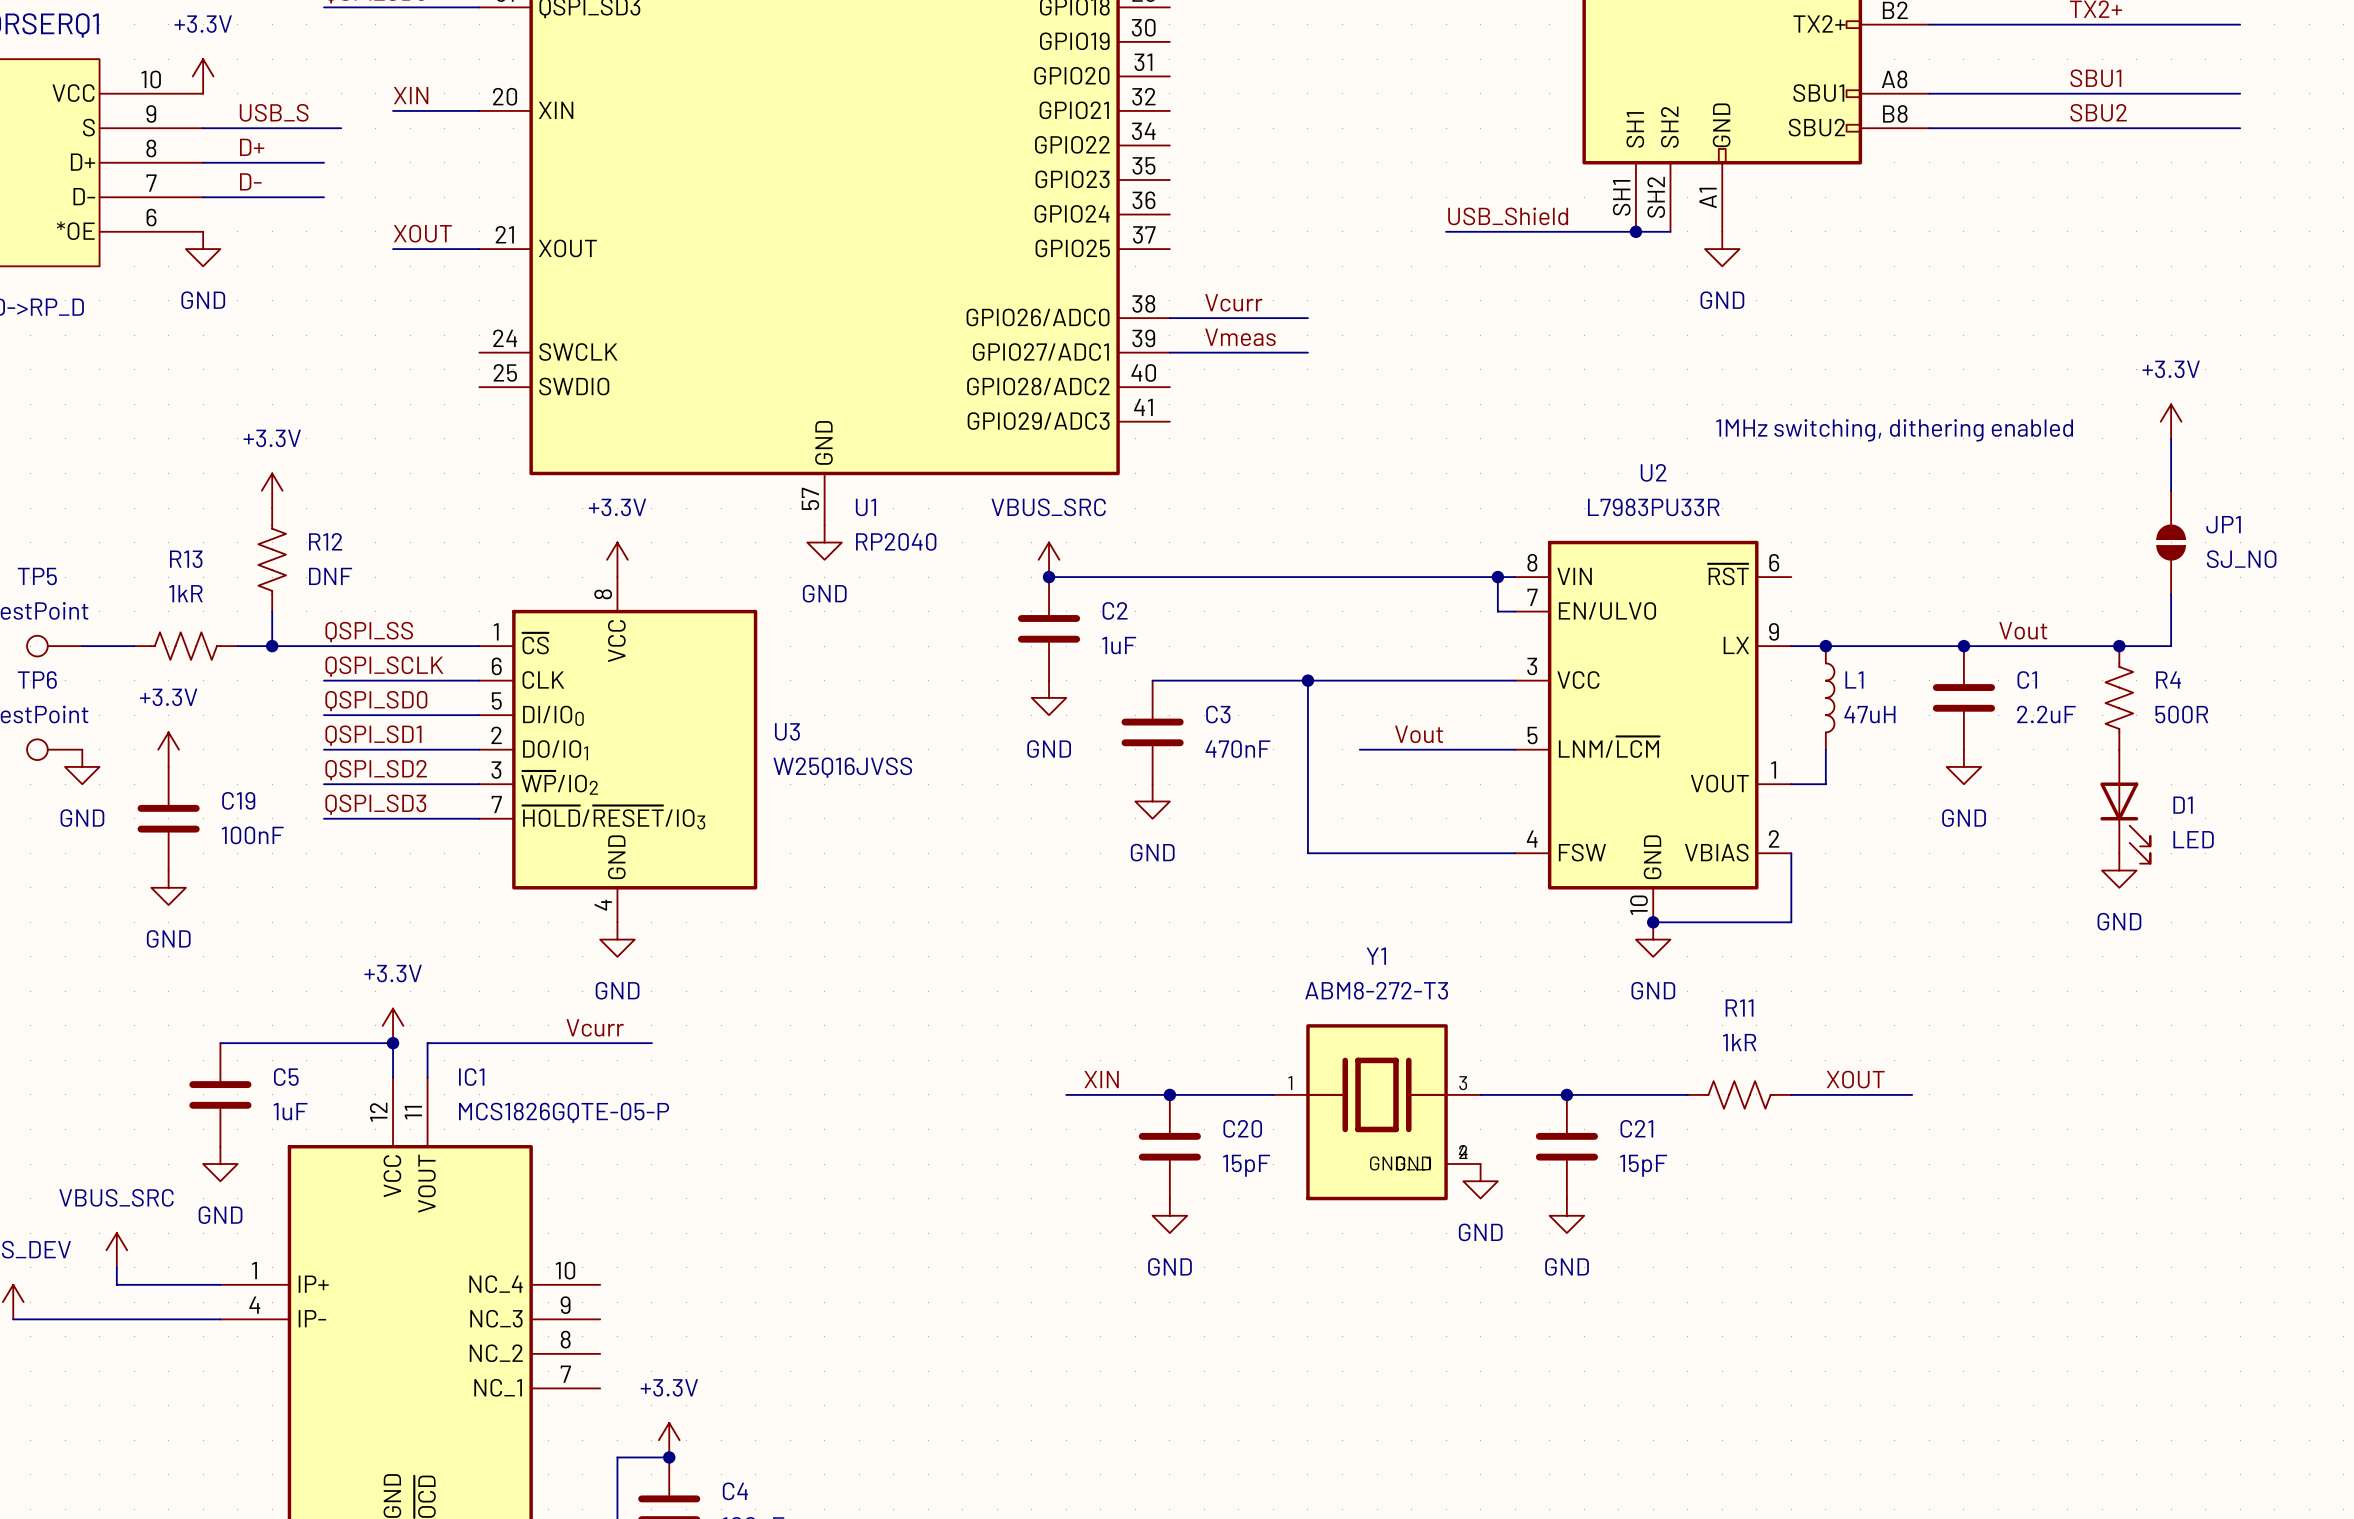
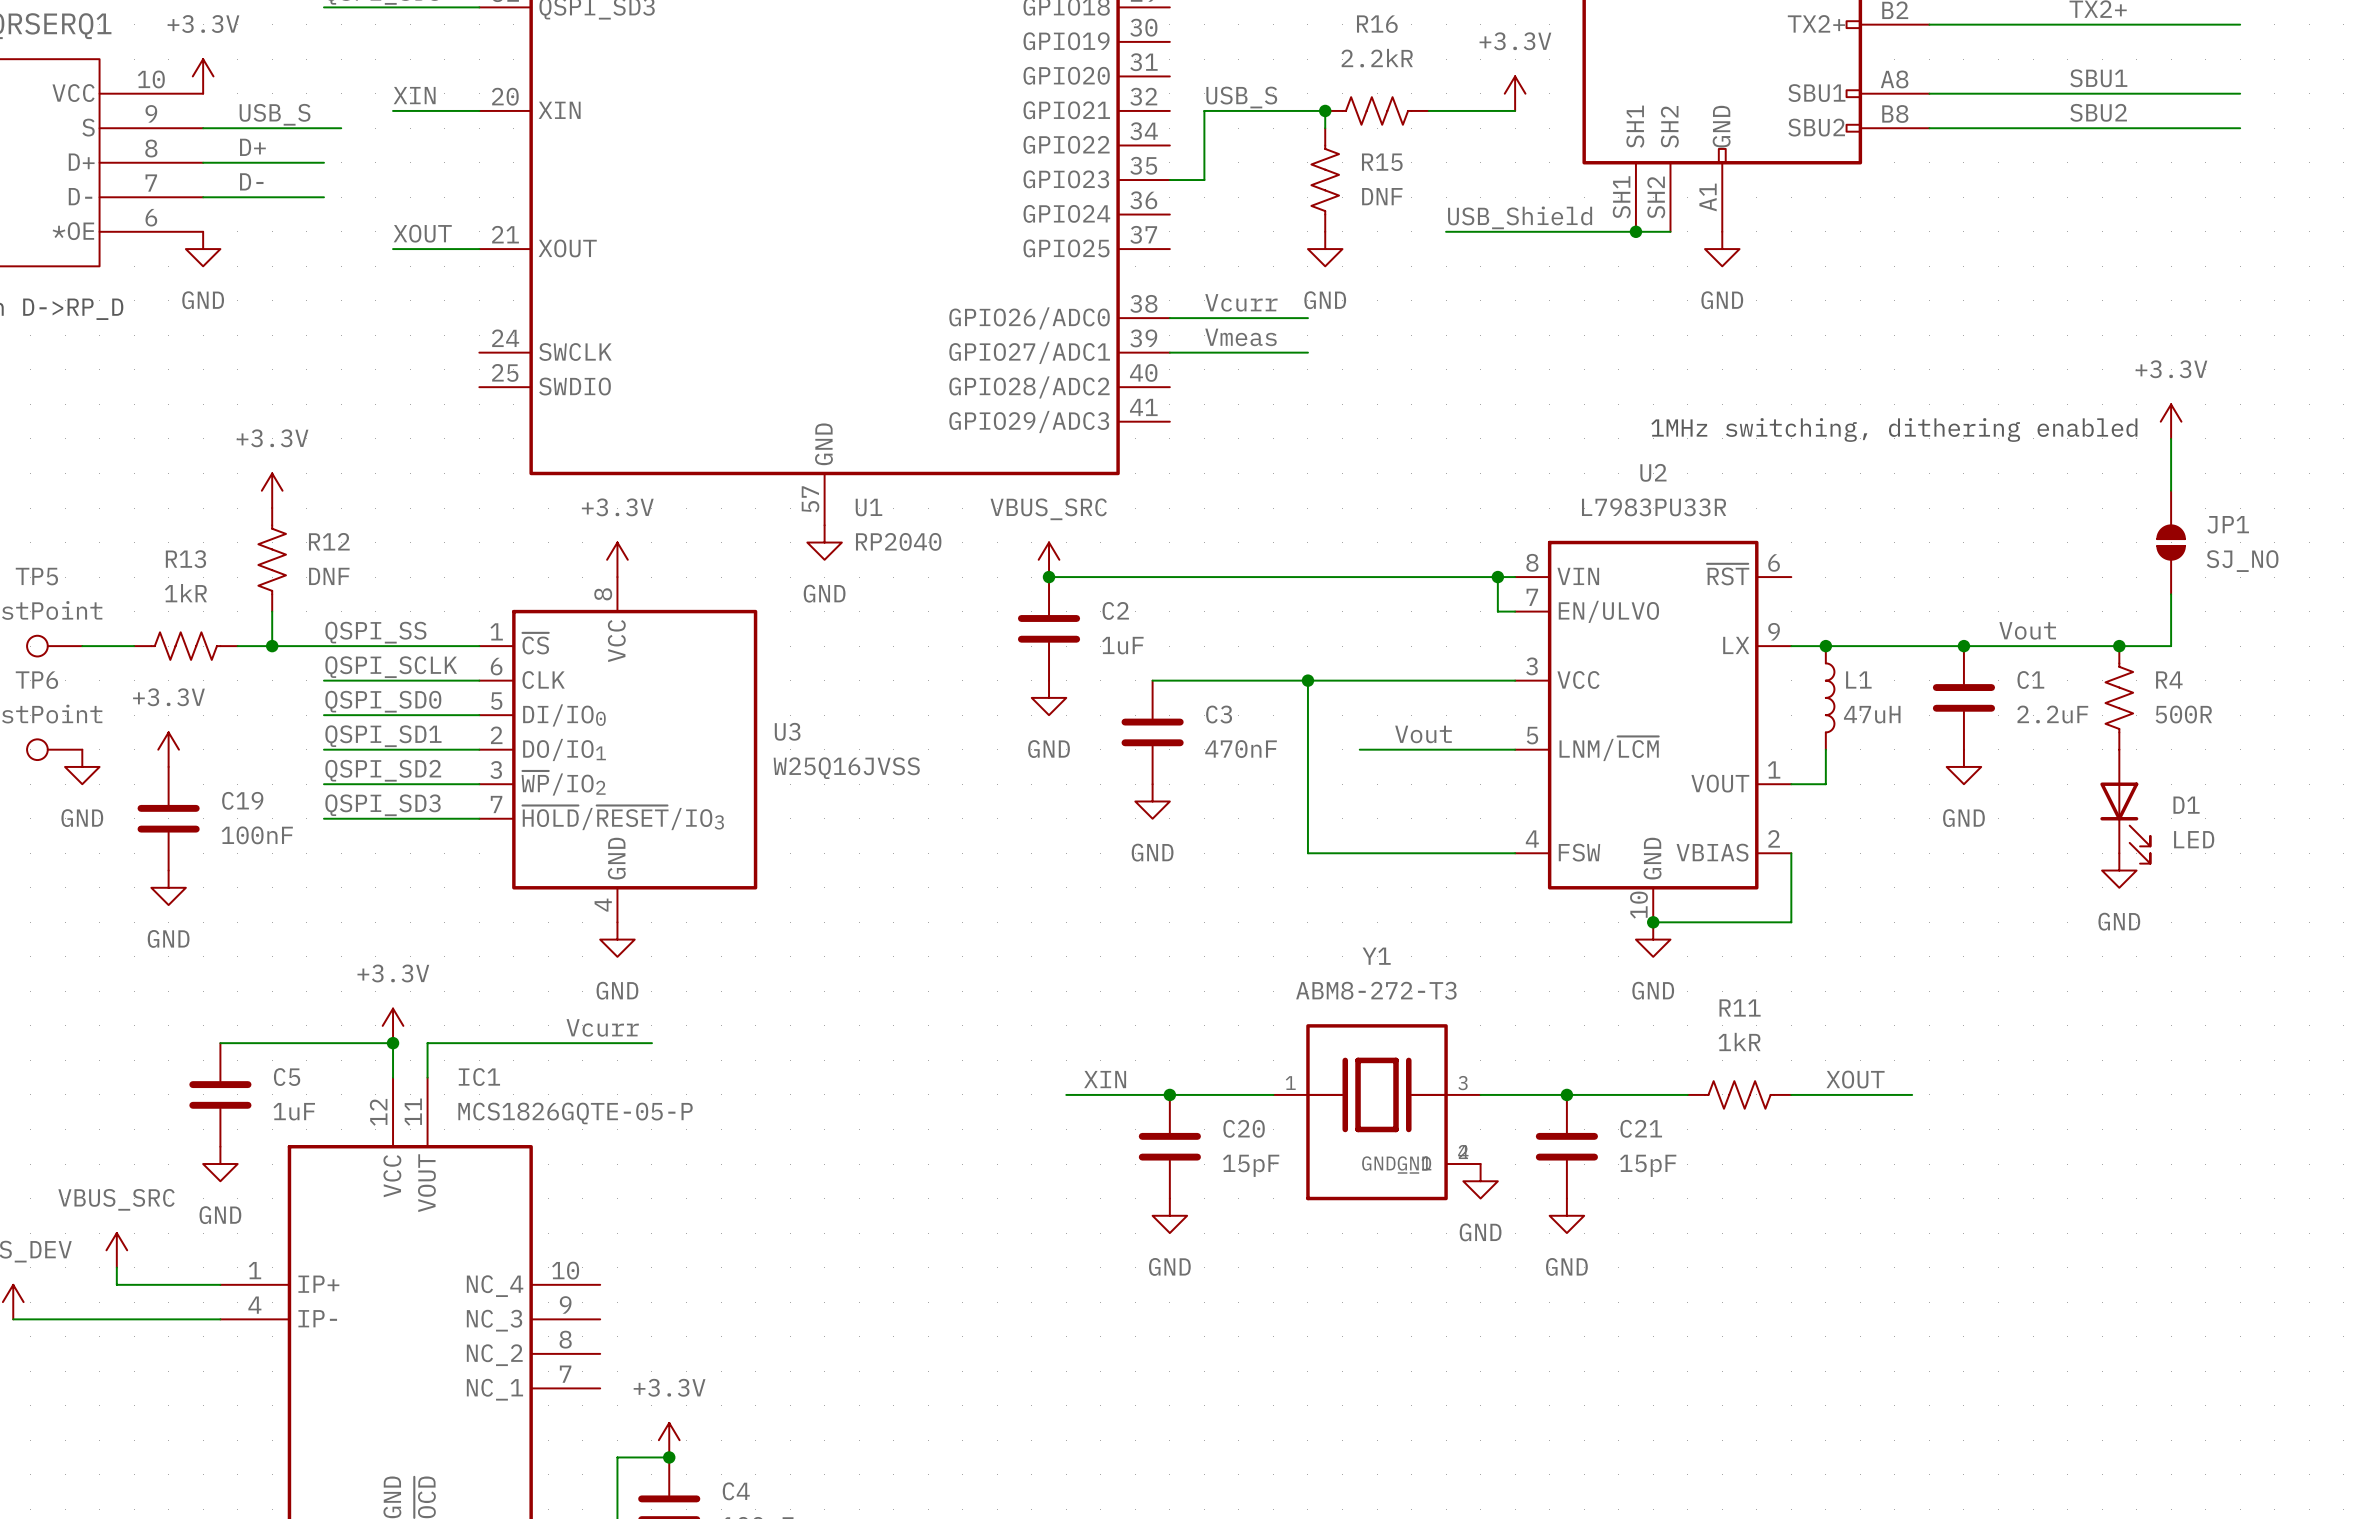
power symbol: none -> +3.3V (1515, 93)
label: none -> USB_S (1241, 97)
junction: none -> (1325, 110)
R16: none -> 2.2kR (1377, 110)
wire: none -> (1428, 110) (1515, 110)
wire: none -> (1325, 128) (1325, 110) (1204, 110) (1204, 180) (1169, 180)
R15: none -> DNF (1325, 180)
power symbol: none -> GND (1325, 249)

